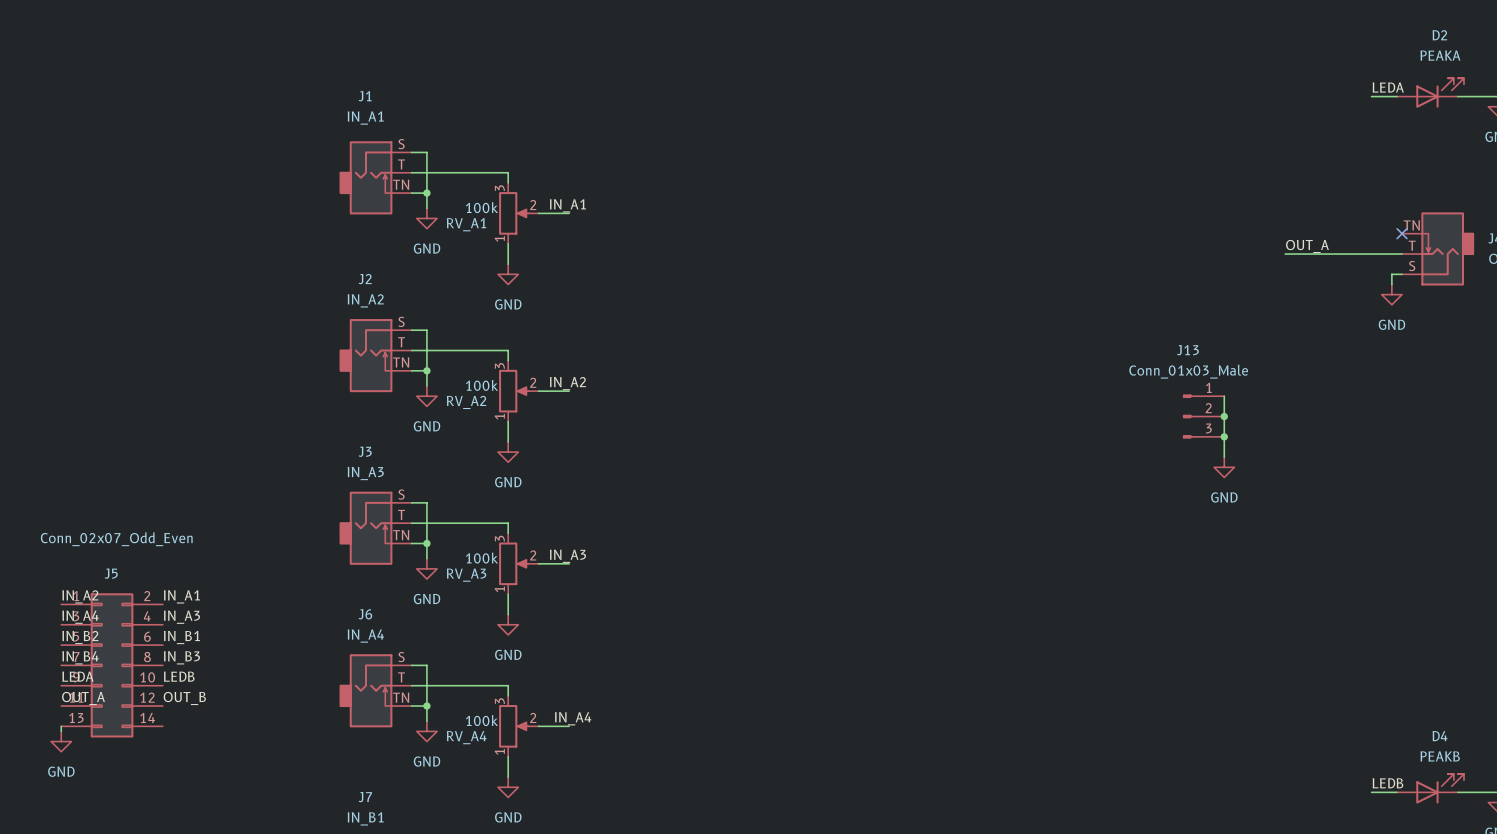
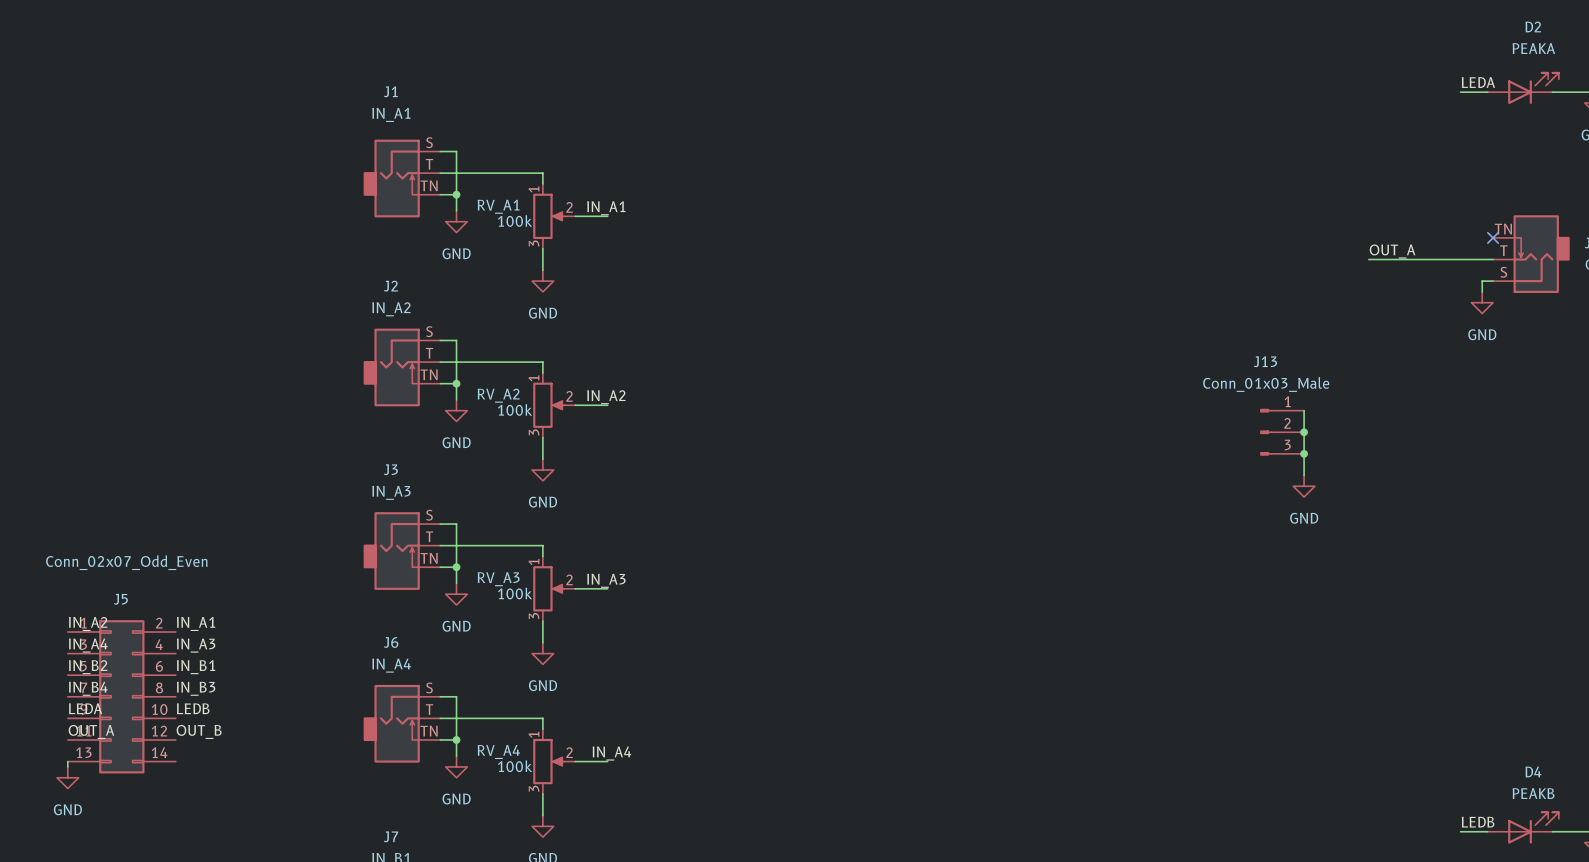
RV_A1 flip: as is (513, 213) -> up-down (548, 216)
RV_A2 flip: as is (513, 391) -> up-down (548, 405)
RV_A3 flip: as is (513, 563) -> up-down (548, 588)
RV_A4 flip: as is (513, 726) -> up-down (548, 761)

